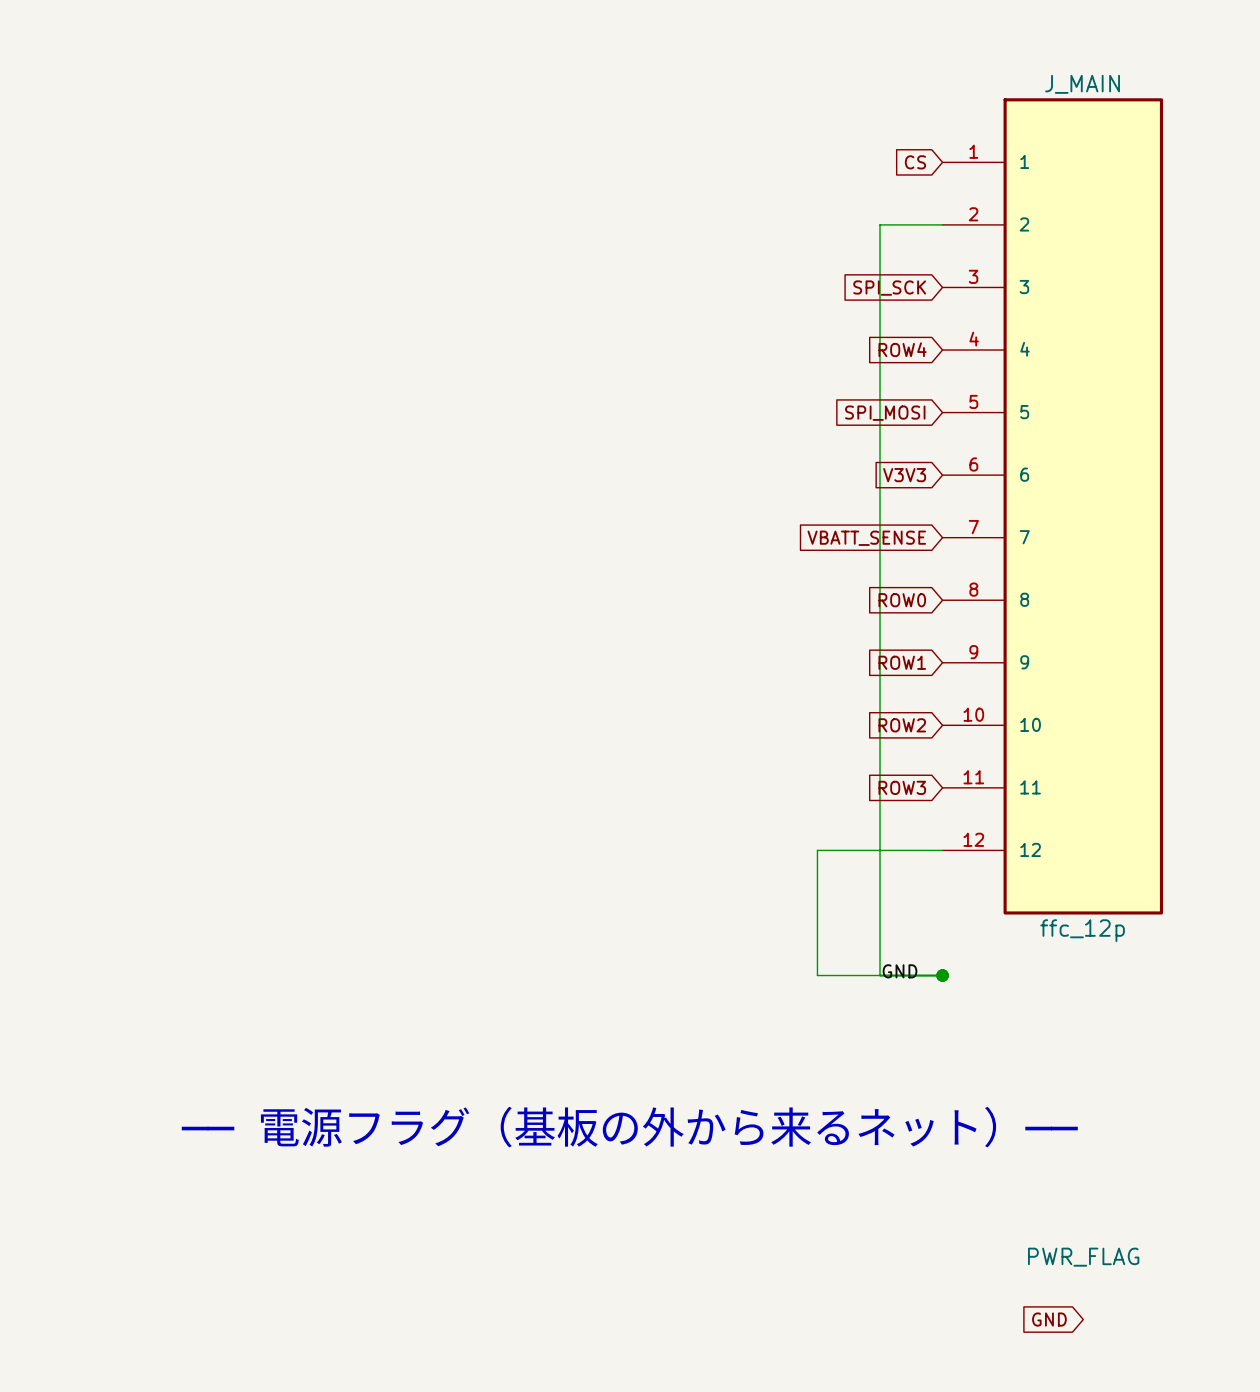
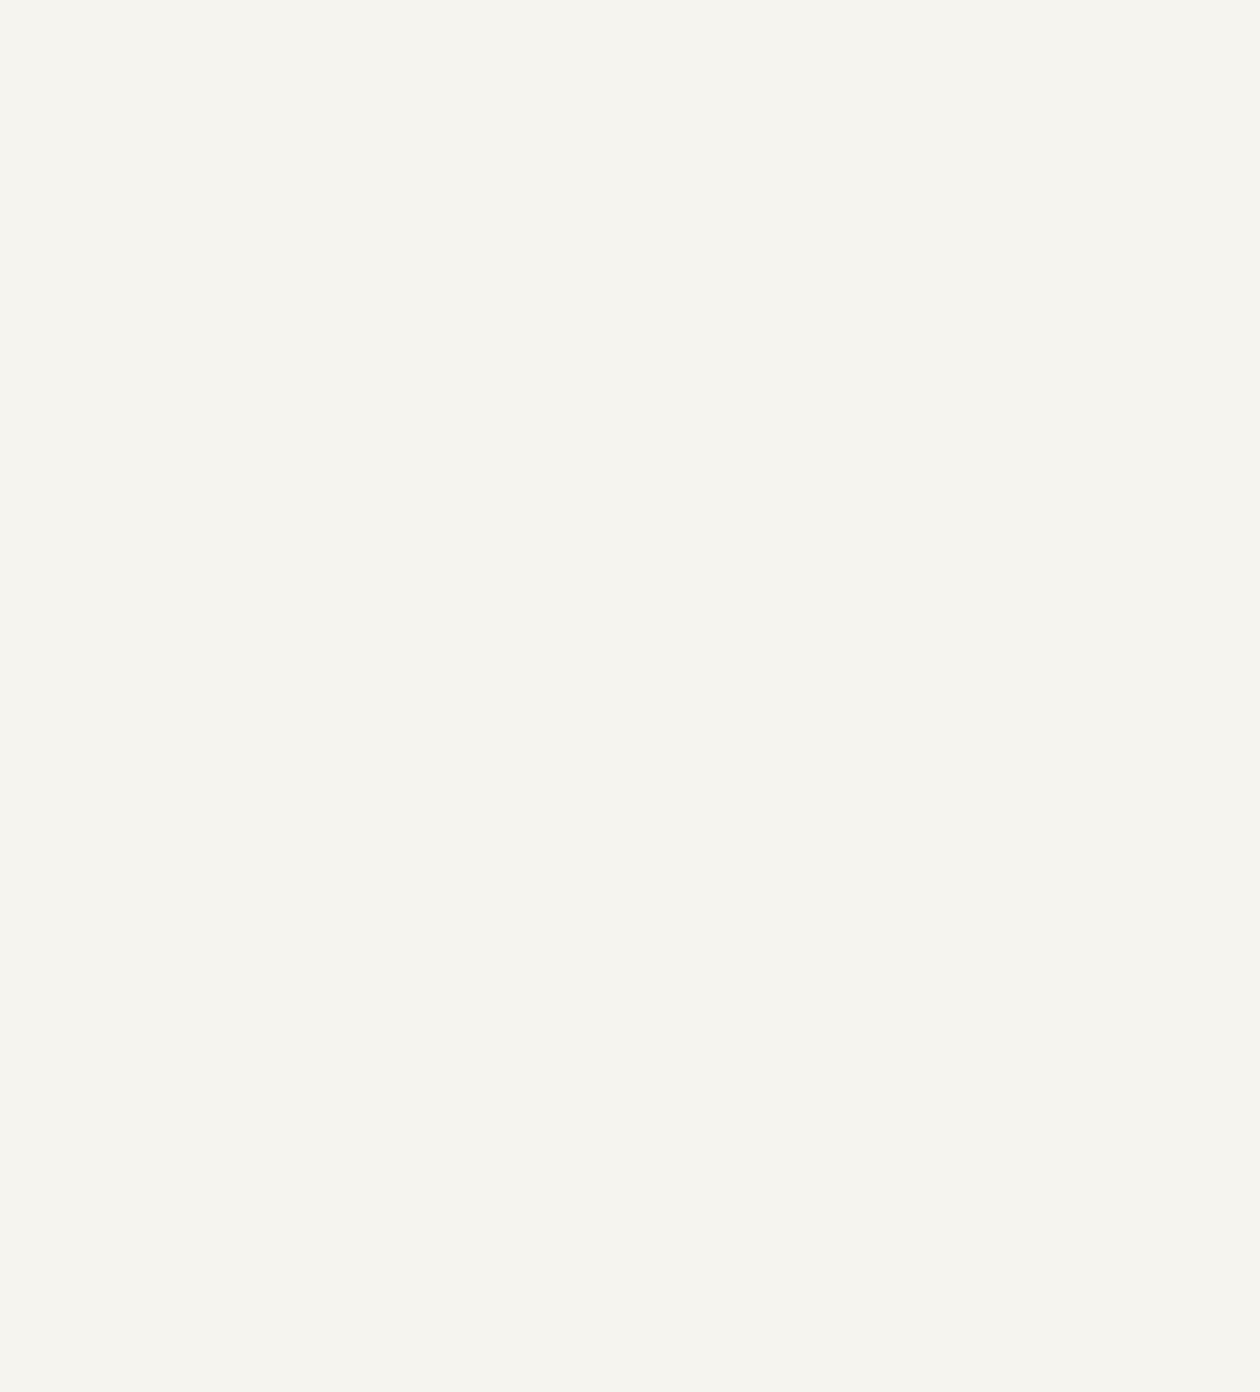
global label: CS (915, 162) -> none
wire: (942, 224) (880, 224) (880, 975) -> none
global label: SPI_SCK (889, 288) -> none
global label: ROW4 (902, 349) -> none
global label: SPI_MOSI (885, 413) -> none
global label: V3V3 (904, 475) -> none
J_MAIN: ffc_12p (1052, 506) -> none
global label: VBATT_SENSE (866, 538) -> none
global label: ROW0 (902, 600) -> none
global label: ROW1 (902, 662) -> none
global label: ROW2 (902, 725) -> none
global label: ROW3 (902, 787) -> none
wire: (942, 850) (817, 850) (817, 975) (942, 975) -> none
label: GND (900, 971) -> none
junction: (942, 975) -> none
text: ── 電源フラグ（基板の外から来るネット）── (629, 1127) -> none
power symbol: PWR_FLAG (1083, 1257) -> none
global label: GND (1049, 1319) -> none

